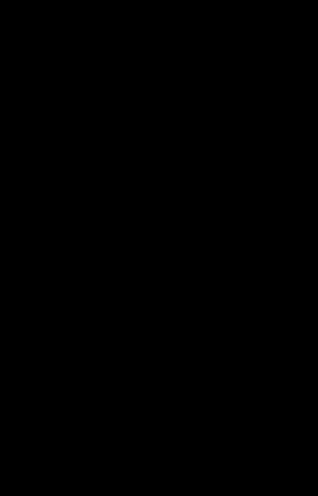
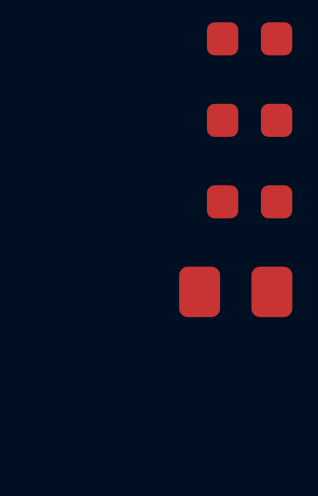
part: none -> (249, 38)
part: none -> (249, 120)
part: none -> (249, 201)
part: none -> (235, 291)

